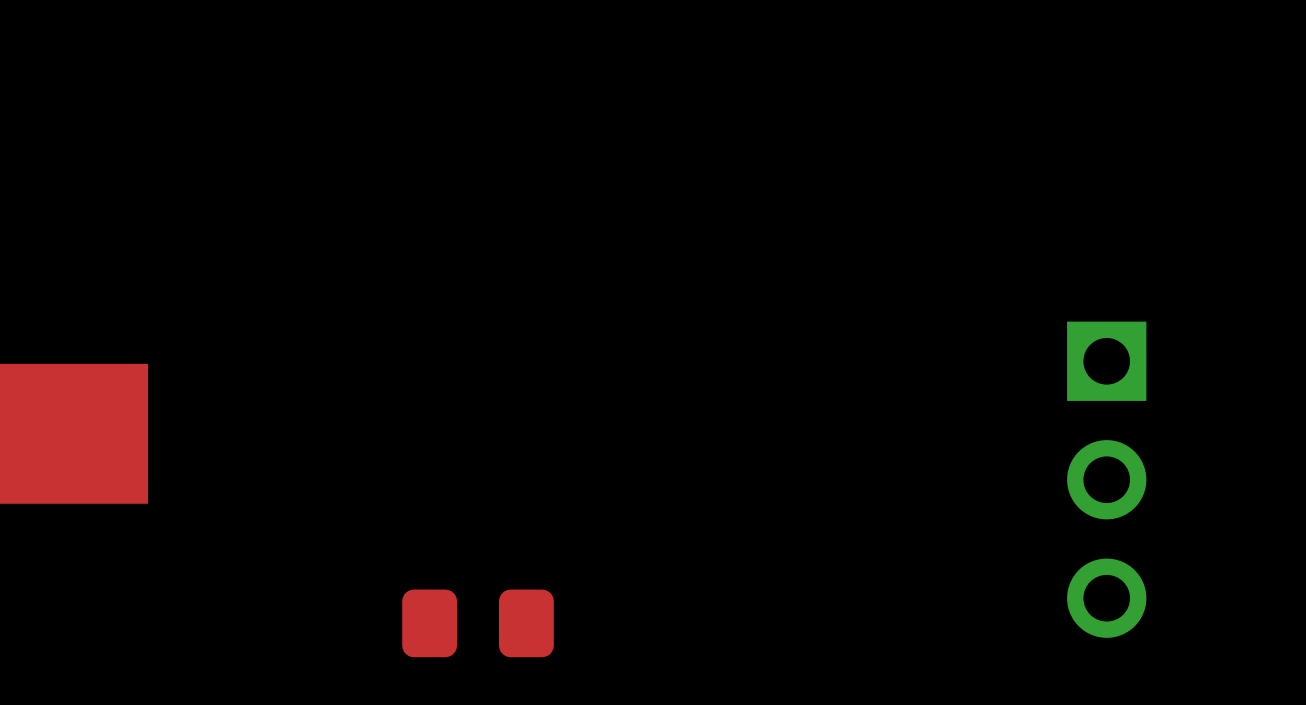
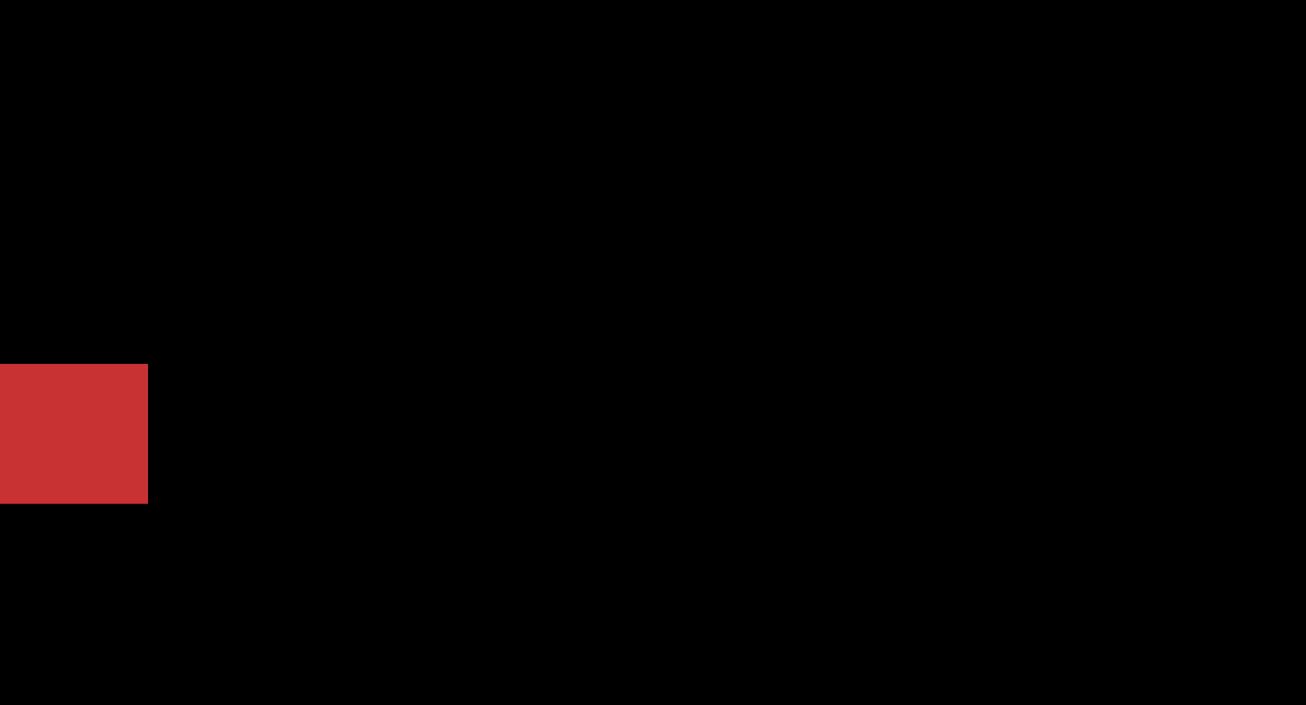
part: (1106, 479) -> none
part: (478, 623) -> none

